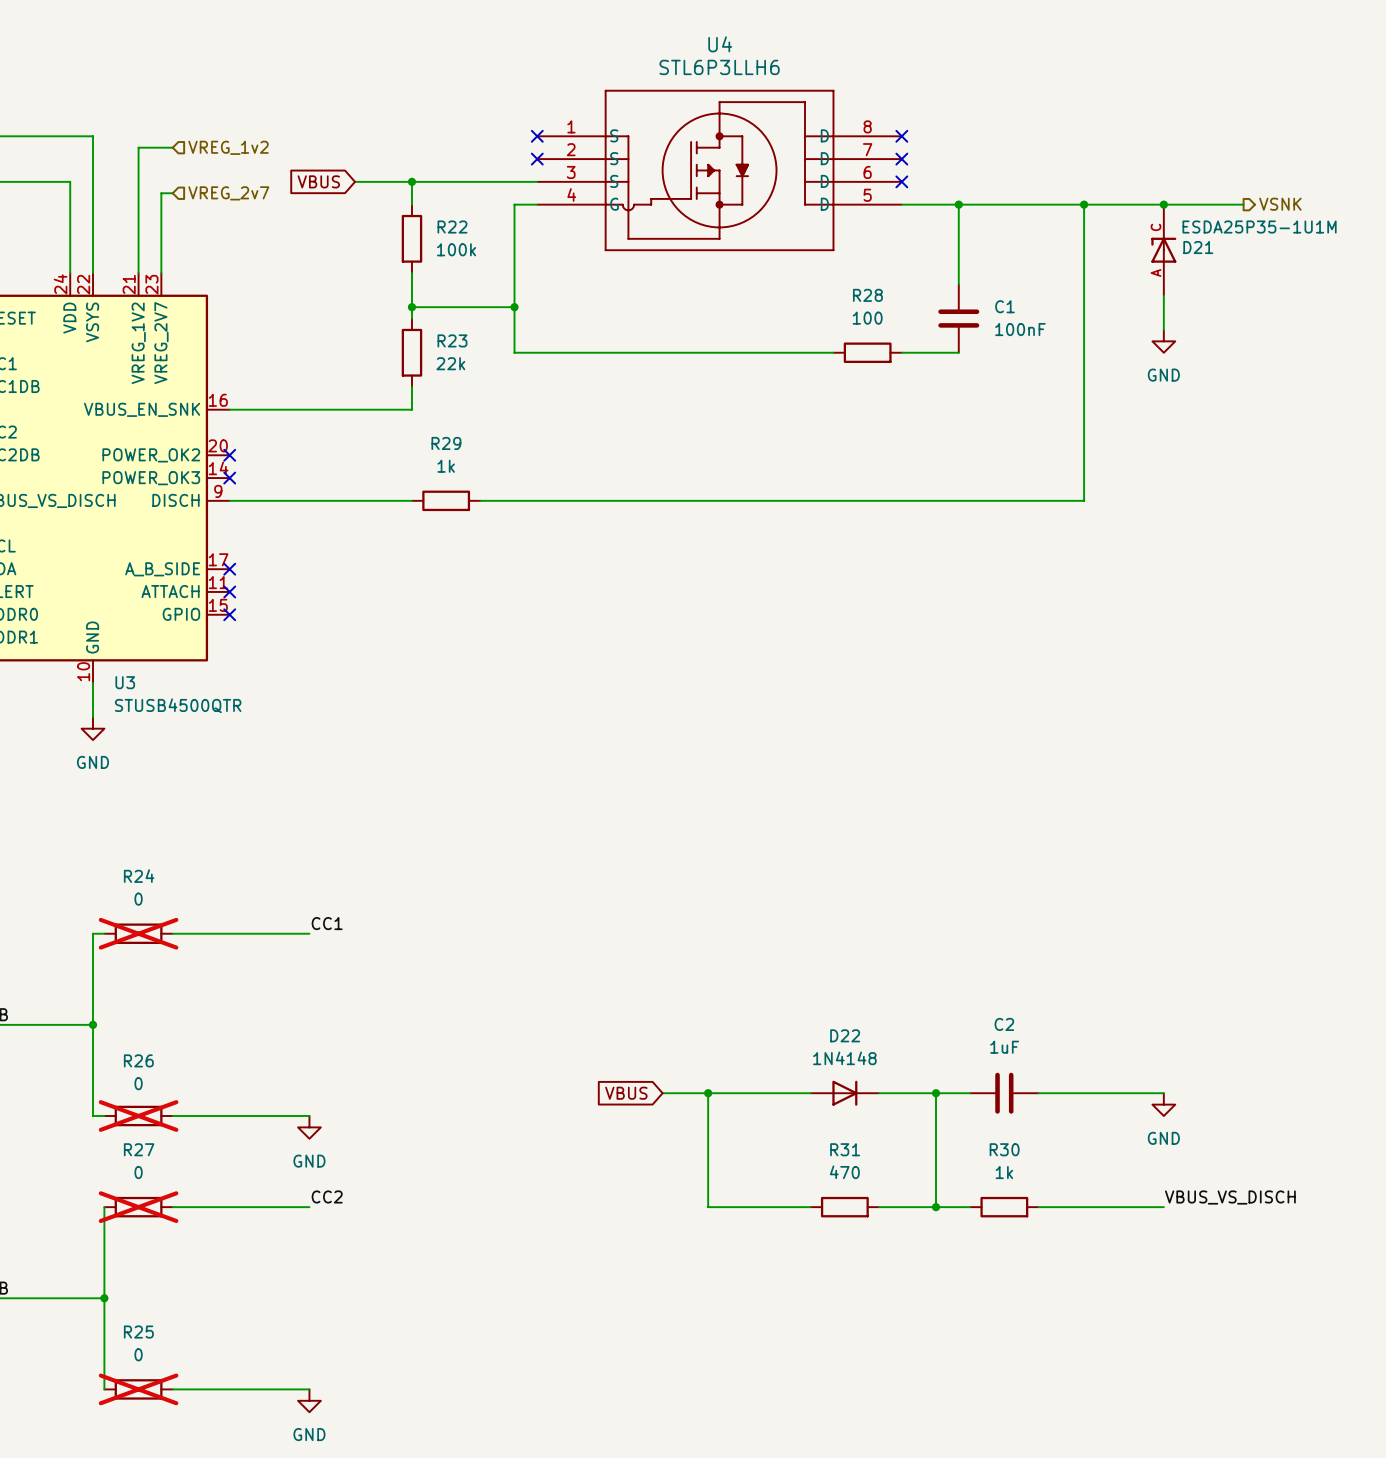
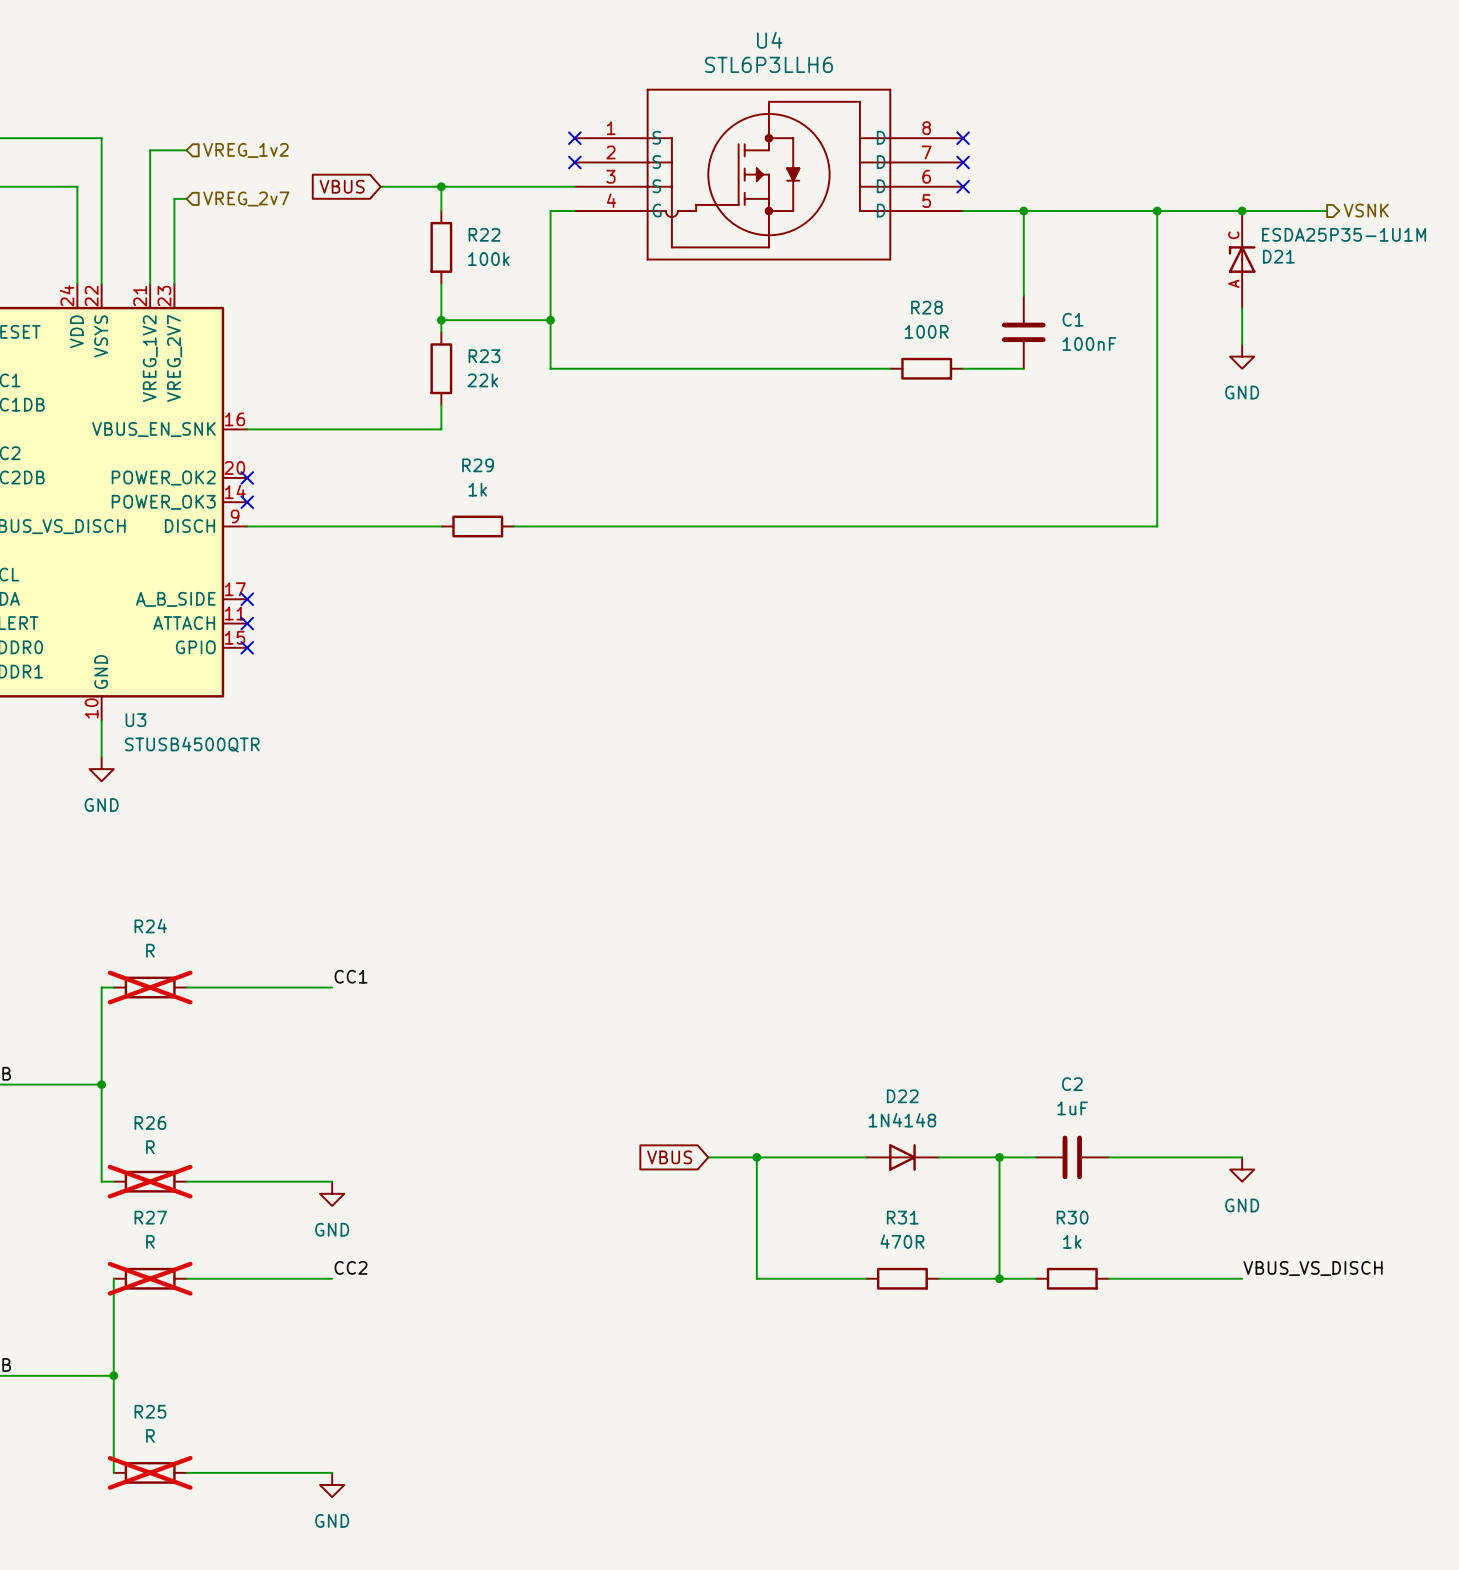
R28 value: 100 (867, 318) -> 100R (926, 331)
R24 value: 0 (138, 899) -> R (150, 950)
R26 value: 0 (138, 1083) -> R (150, 1147)
R27 value: 0 (138, 1172) -> R (150, 1241)
R31 value: 470 (844, 1172) -> 470R (902, 1241)
R25 value: 0 (138, 1354) -> R (150, 1436)

